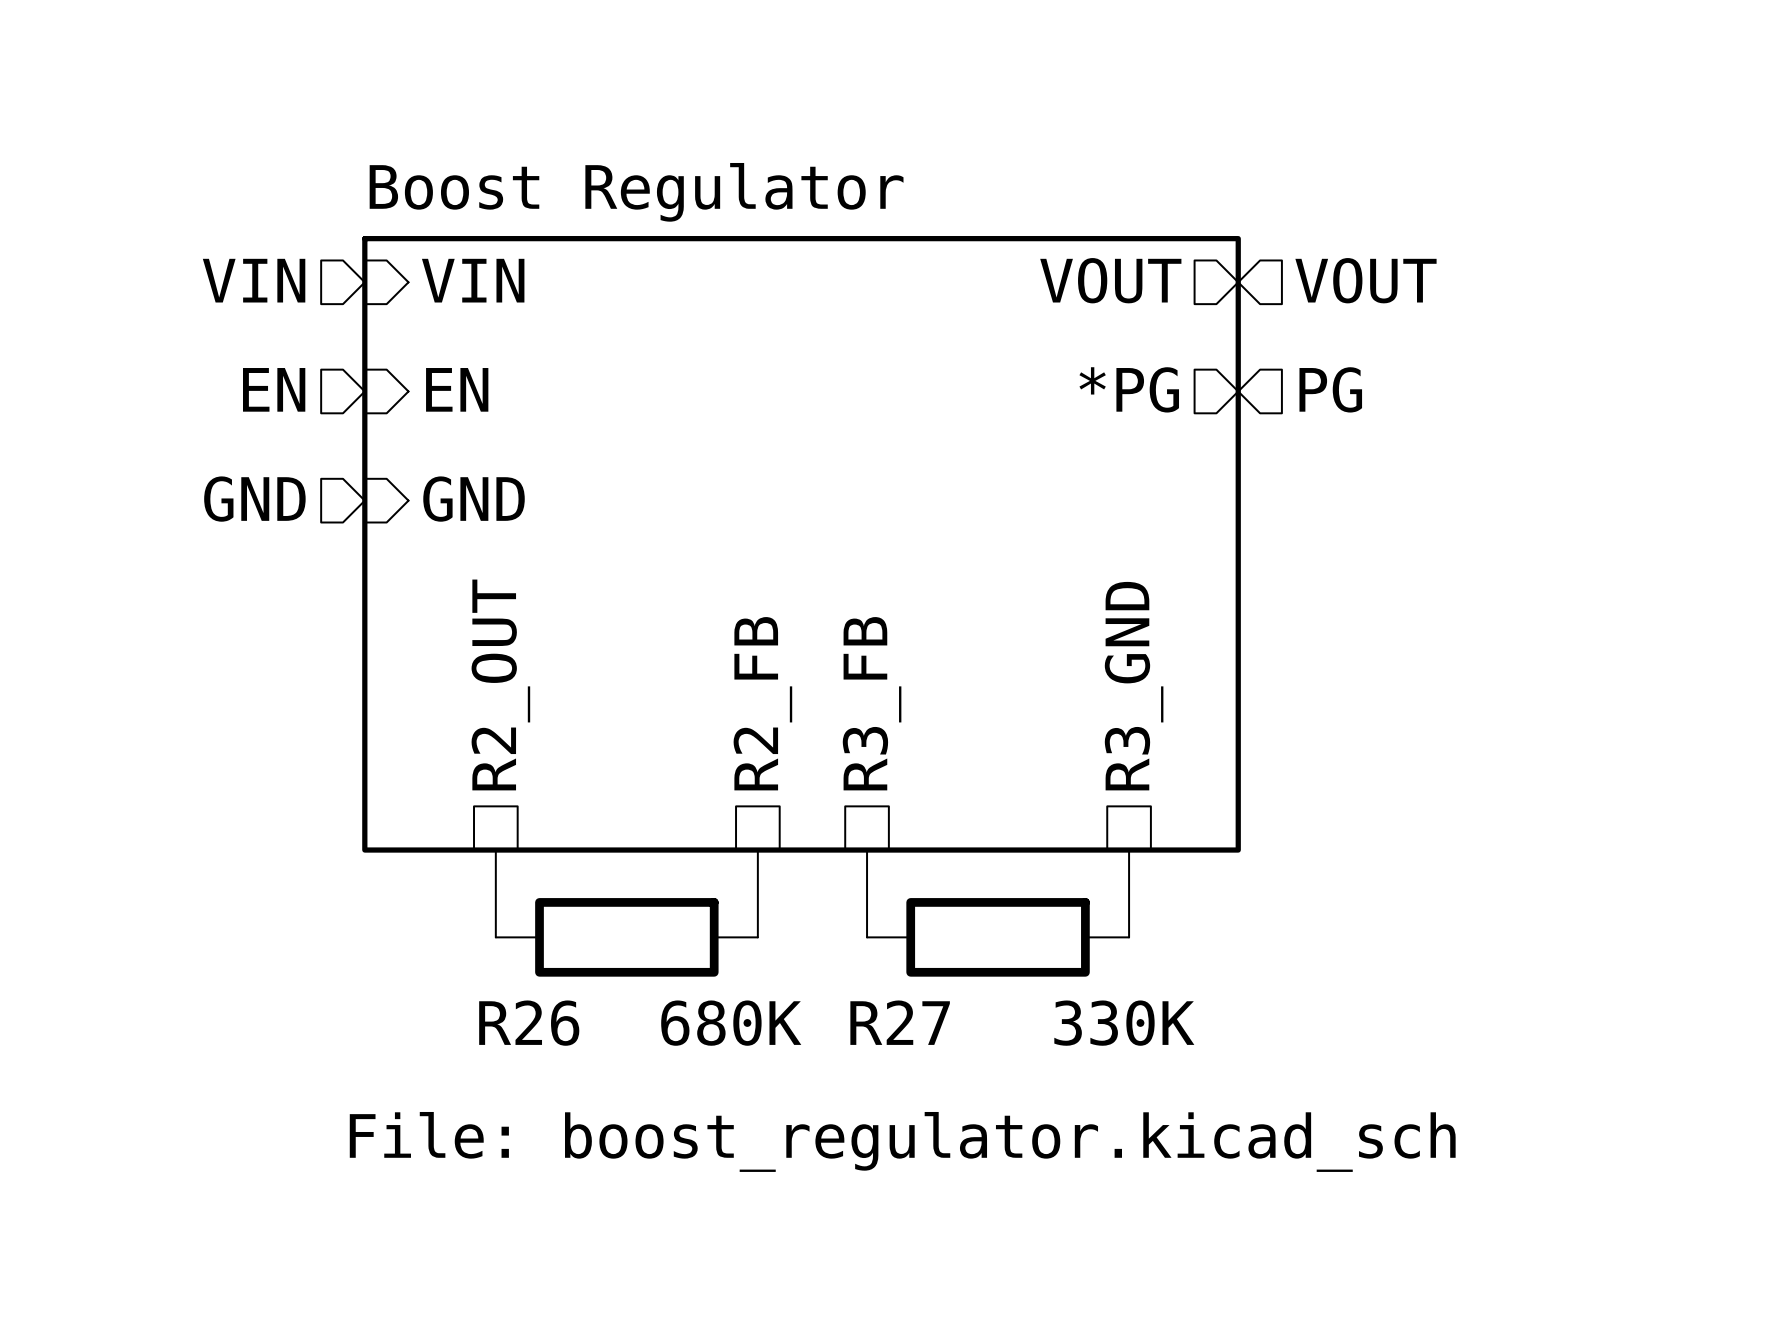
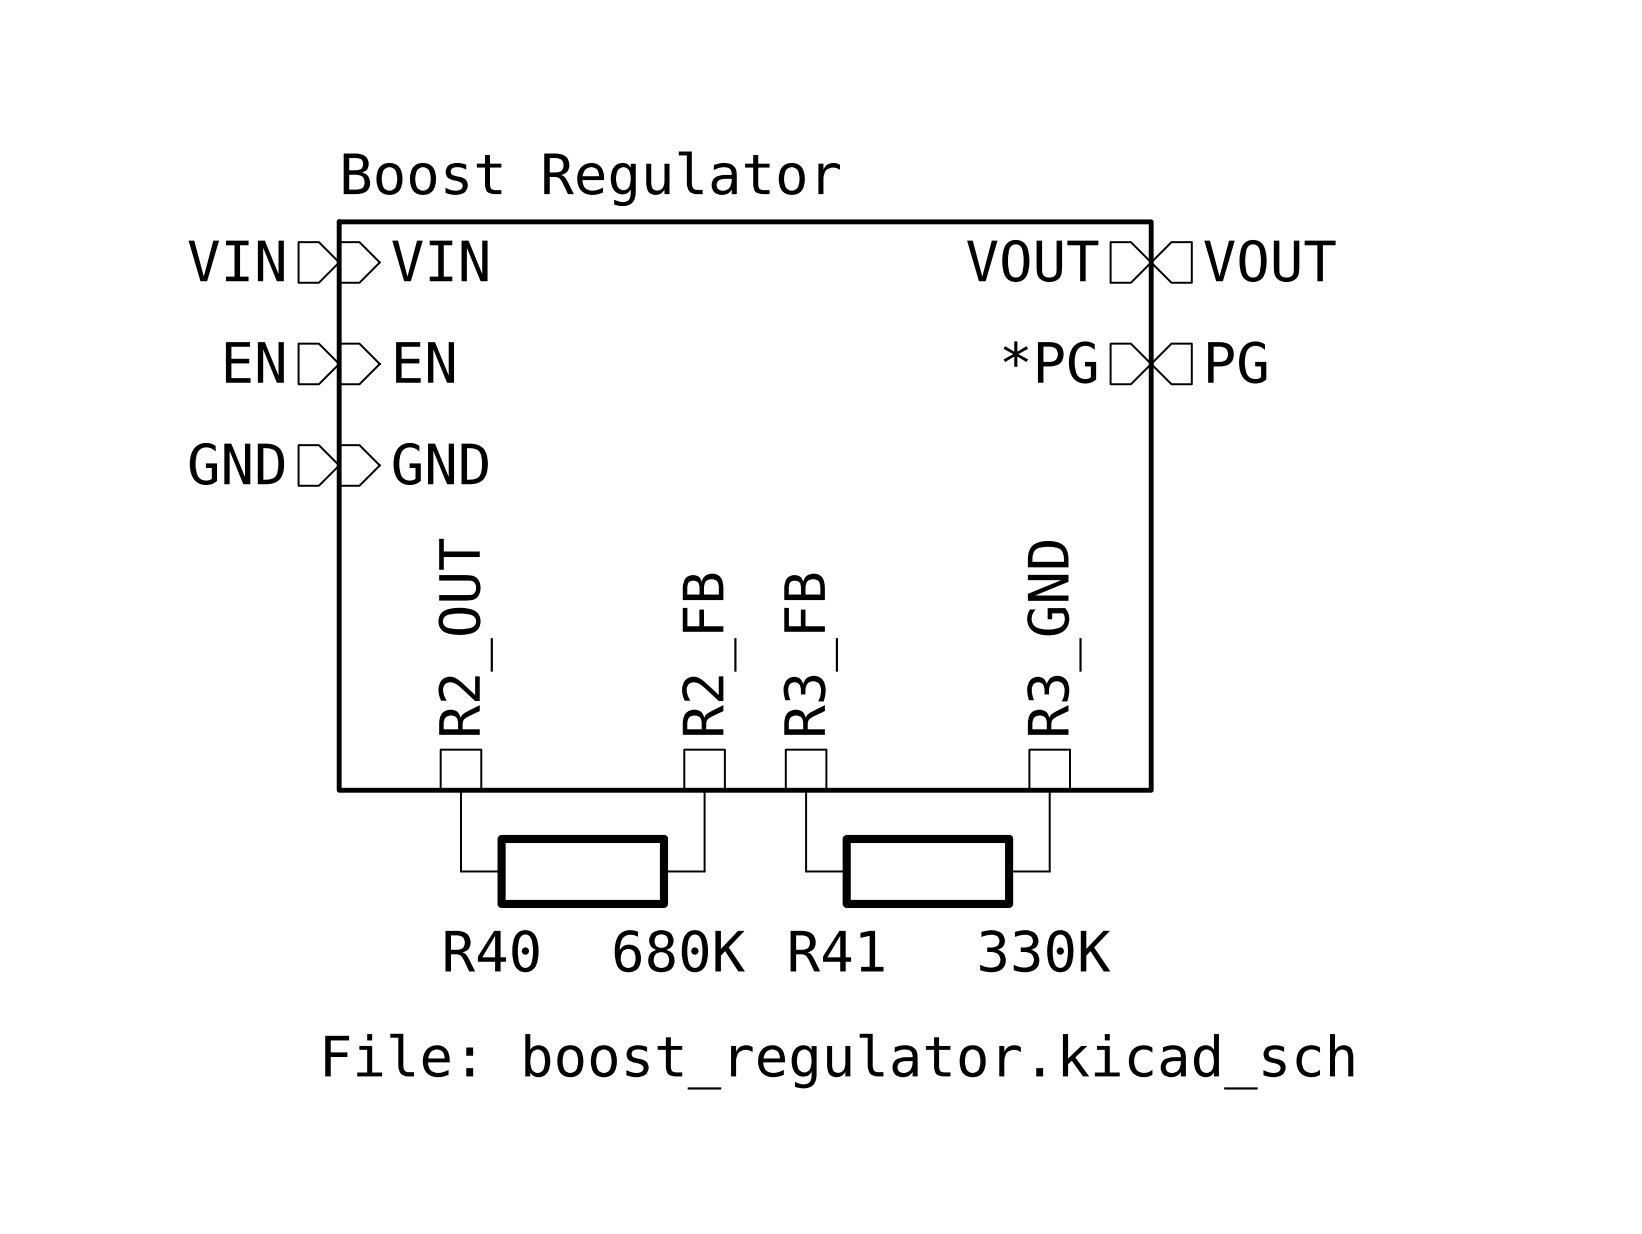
R27 name: R27 (900, 1022) -> R41 (837, 951)
R26 name: R26 (529, 1023) -> R40 (492, 951)

